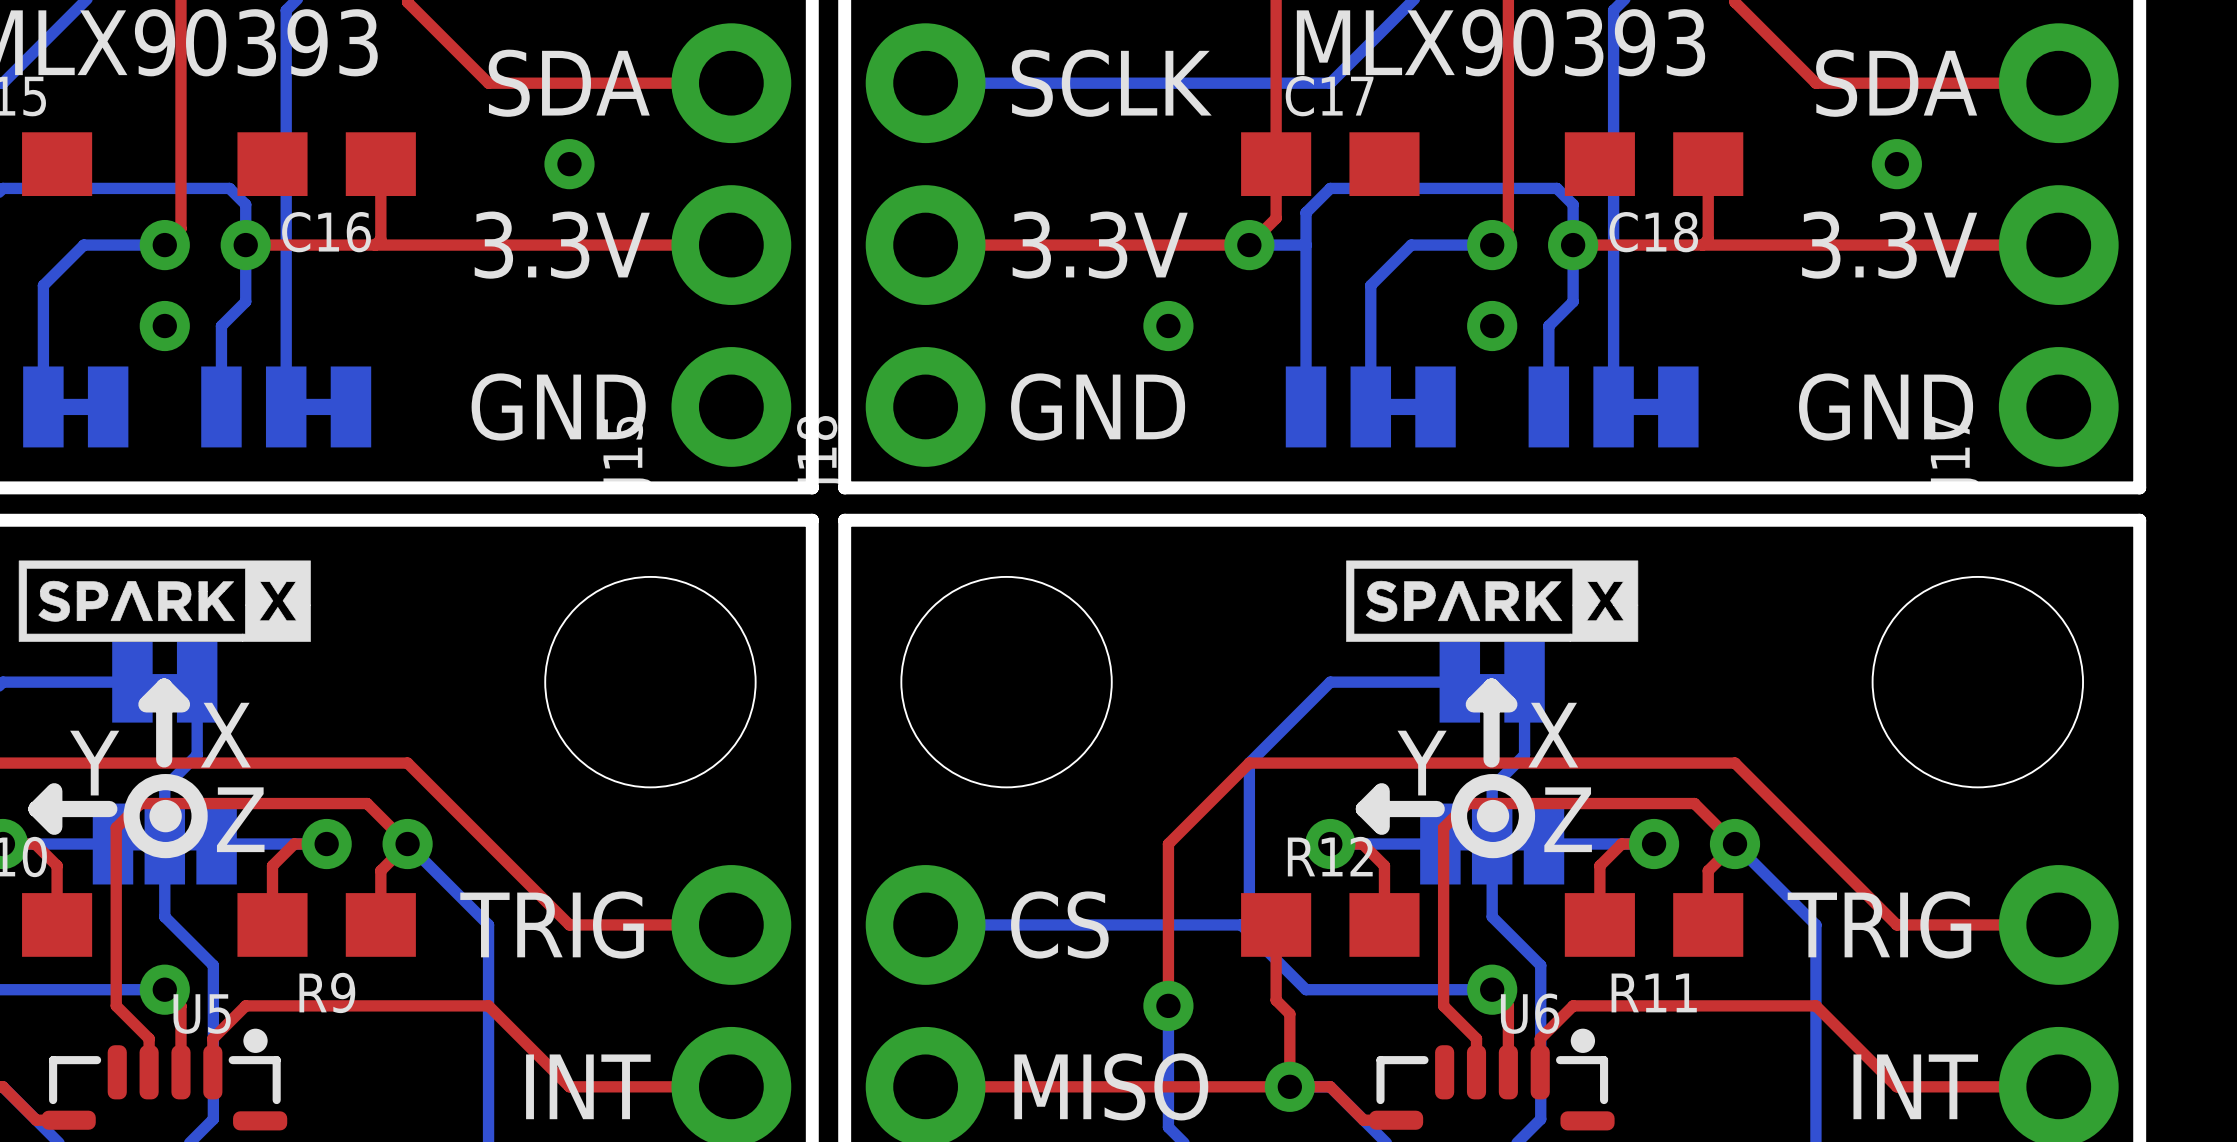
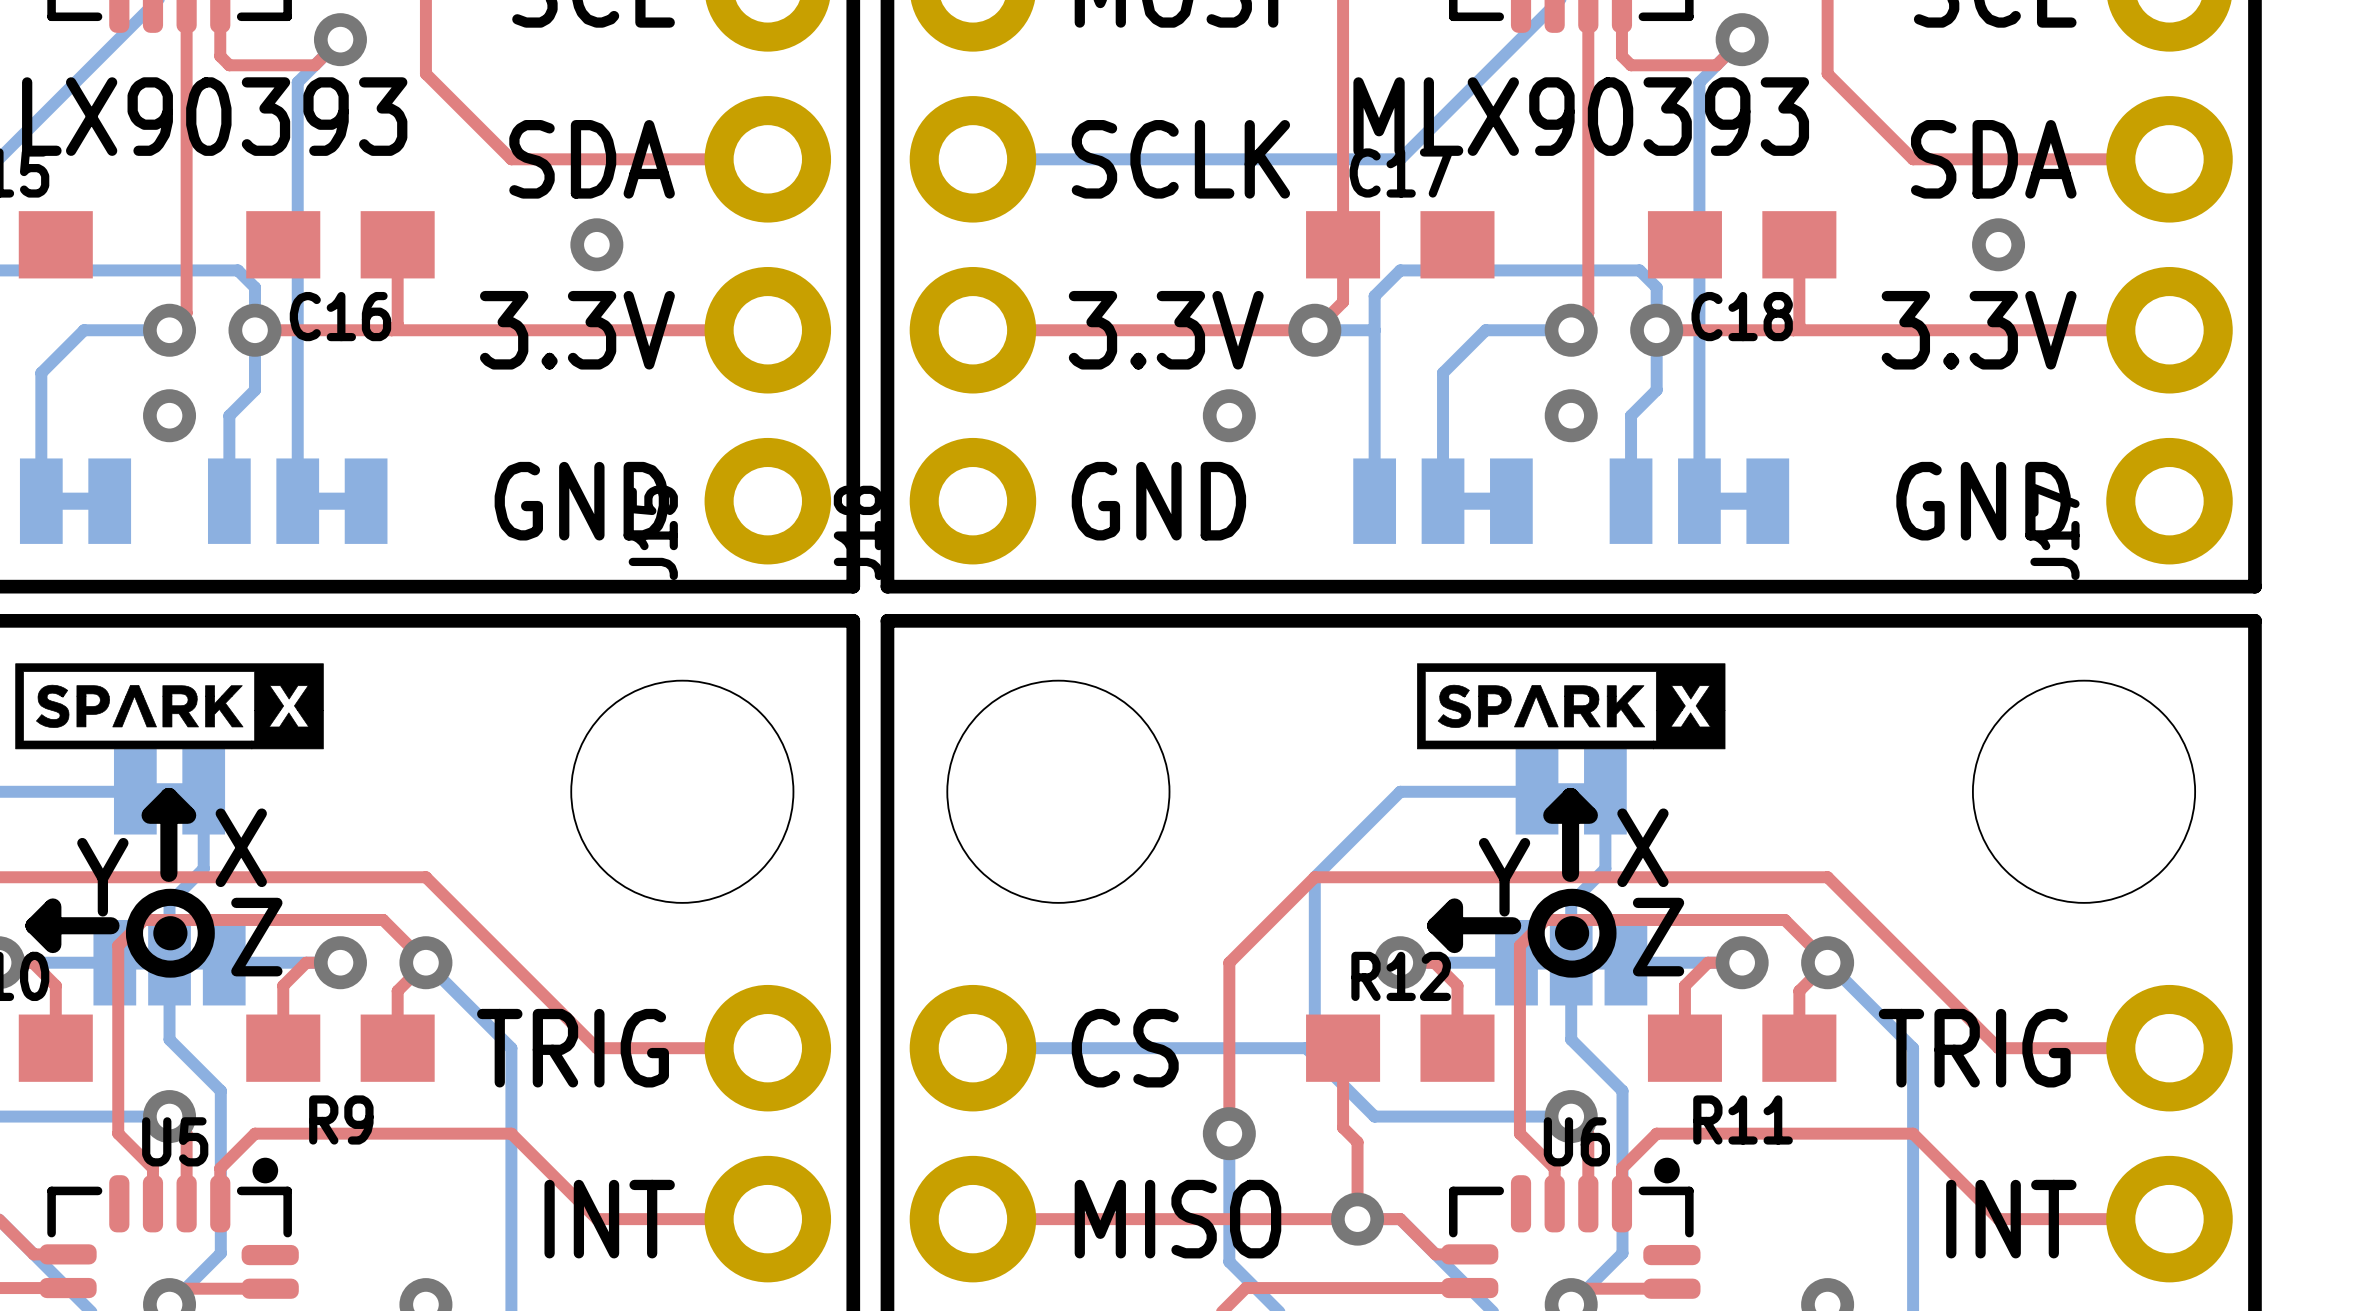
U6 name position: U6 (1530, 1013) -> U6 (1576, 1141)
U5 name position: U5 (202, 1014) -> U5 (175, 1141)

